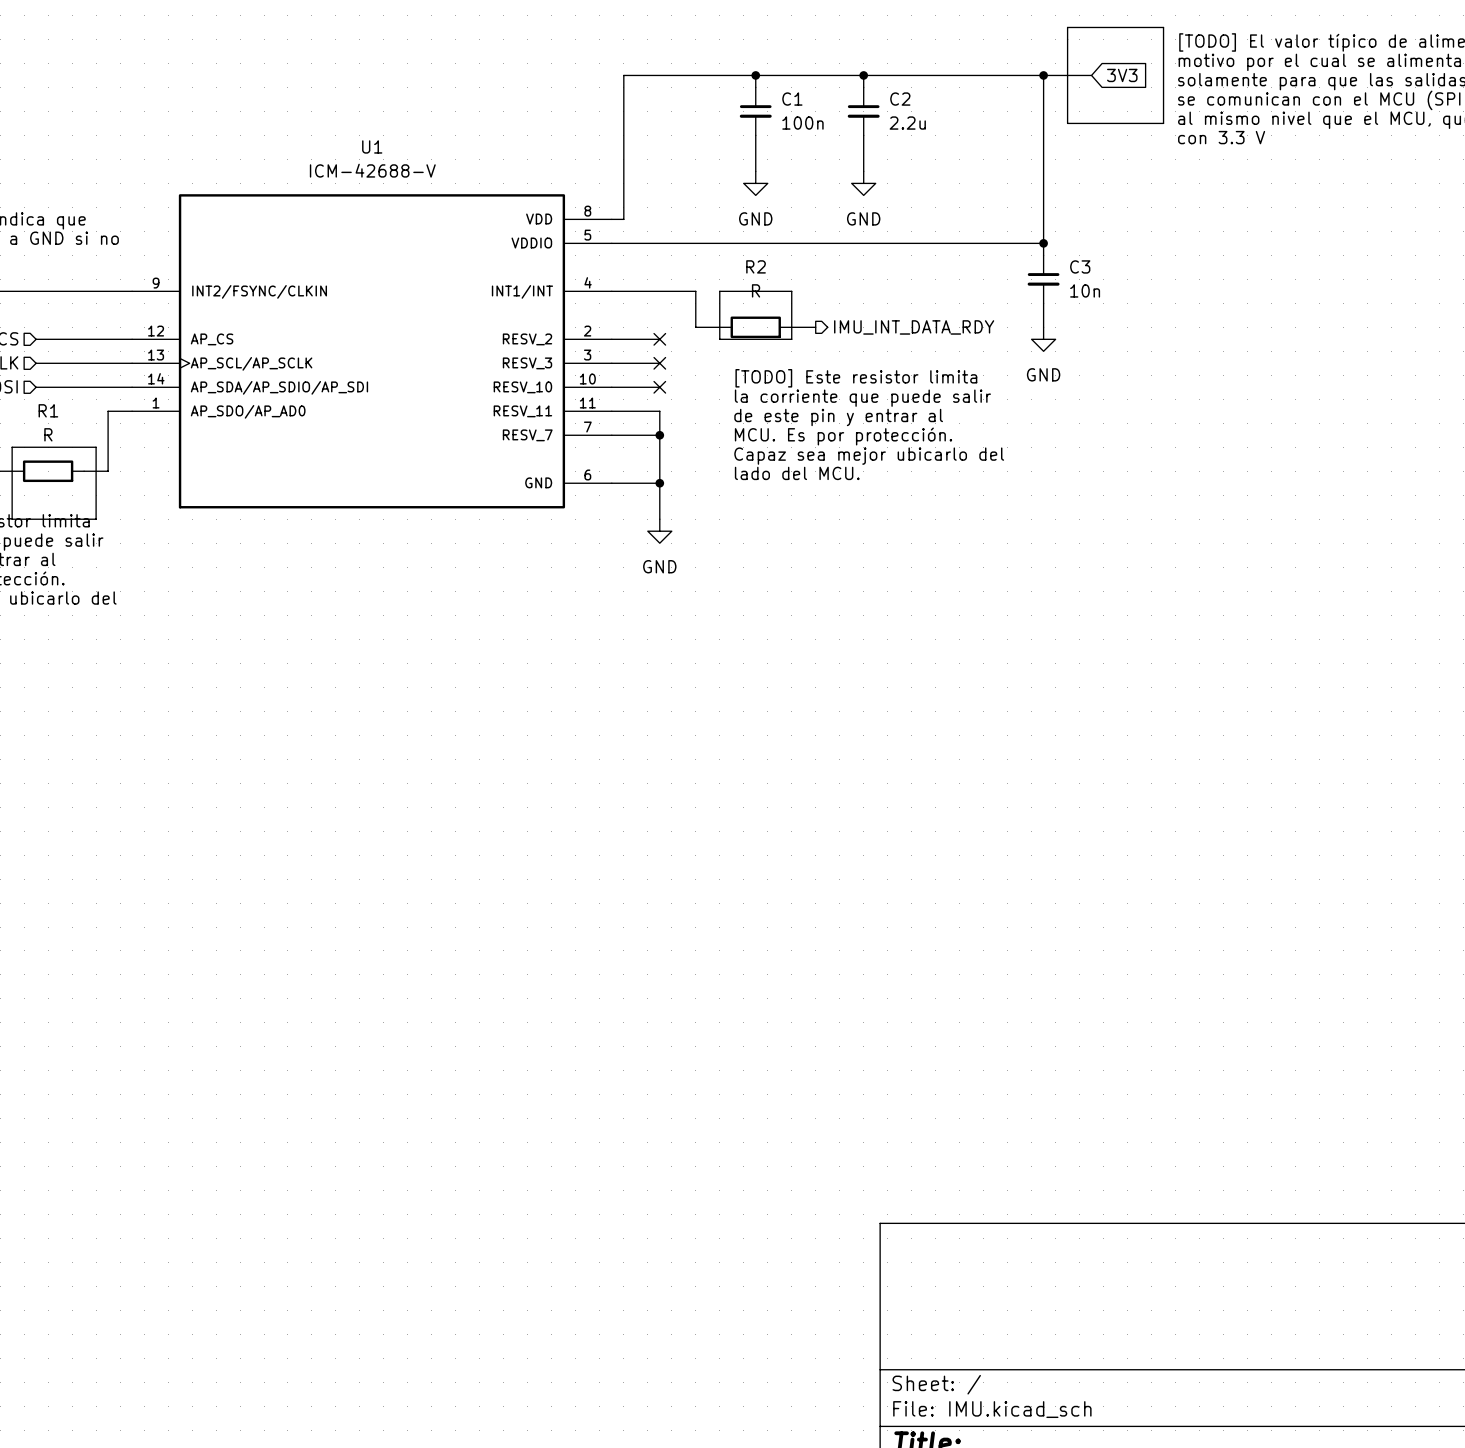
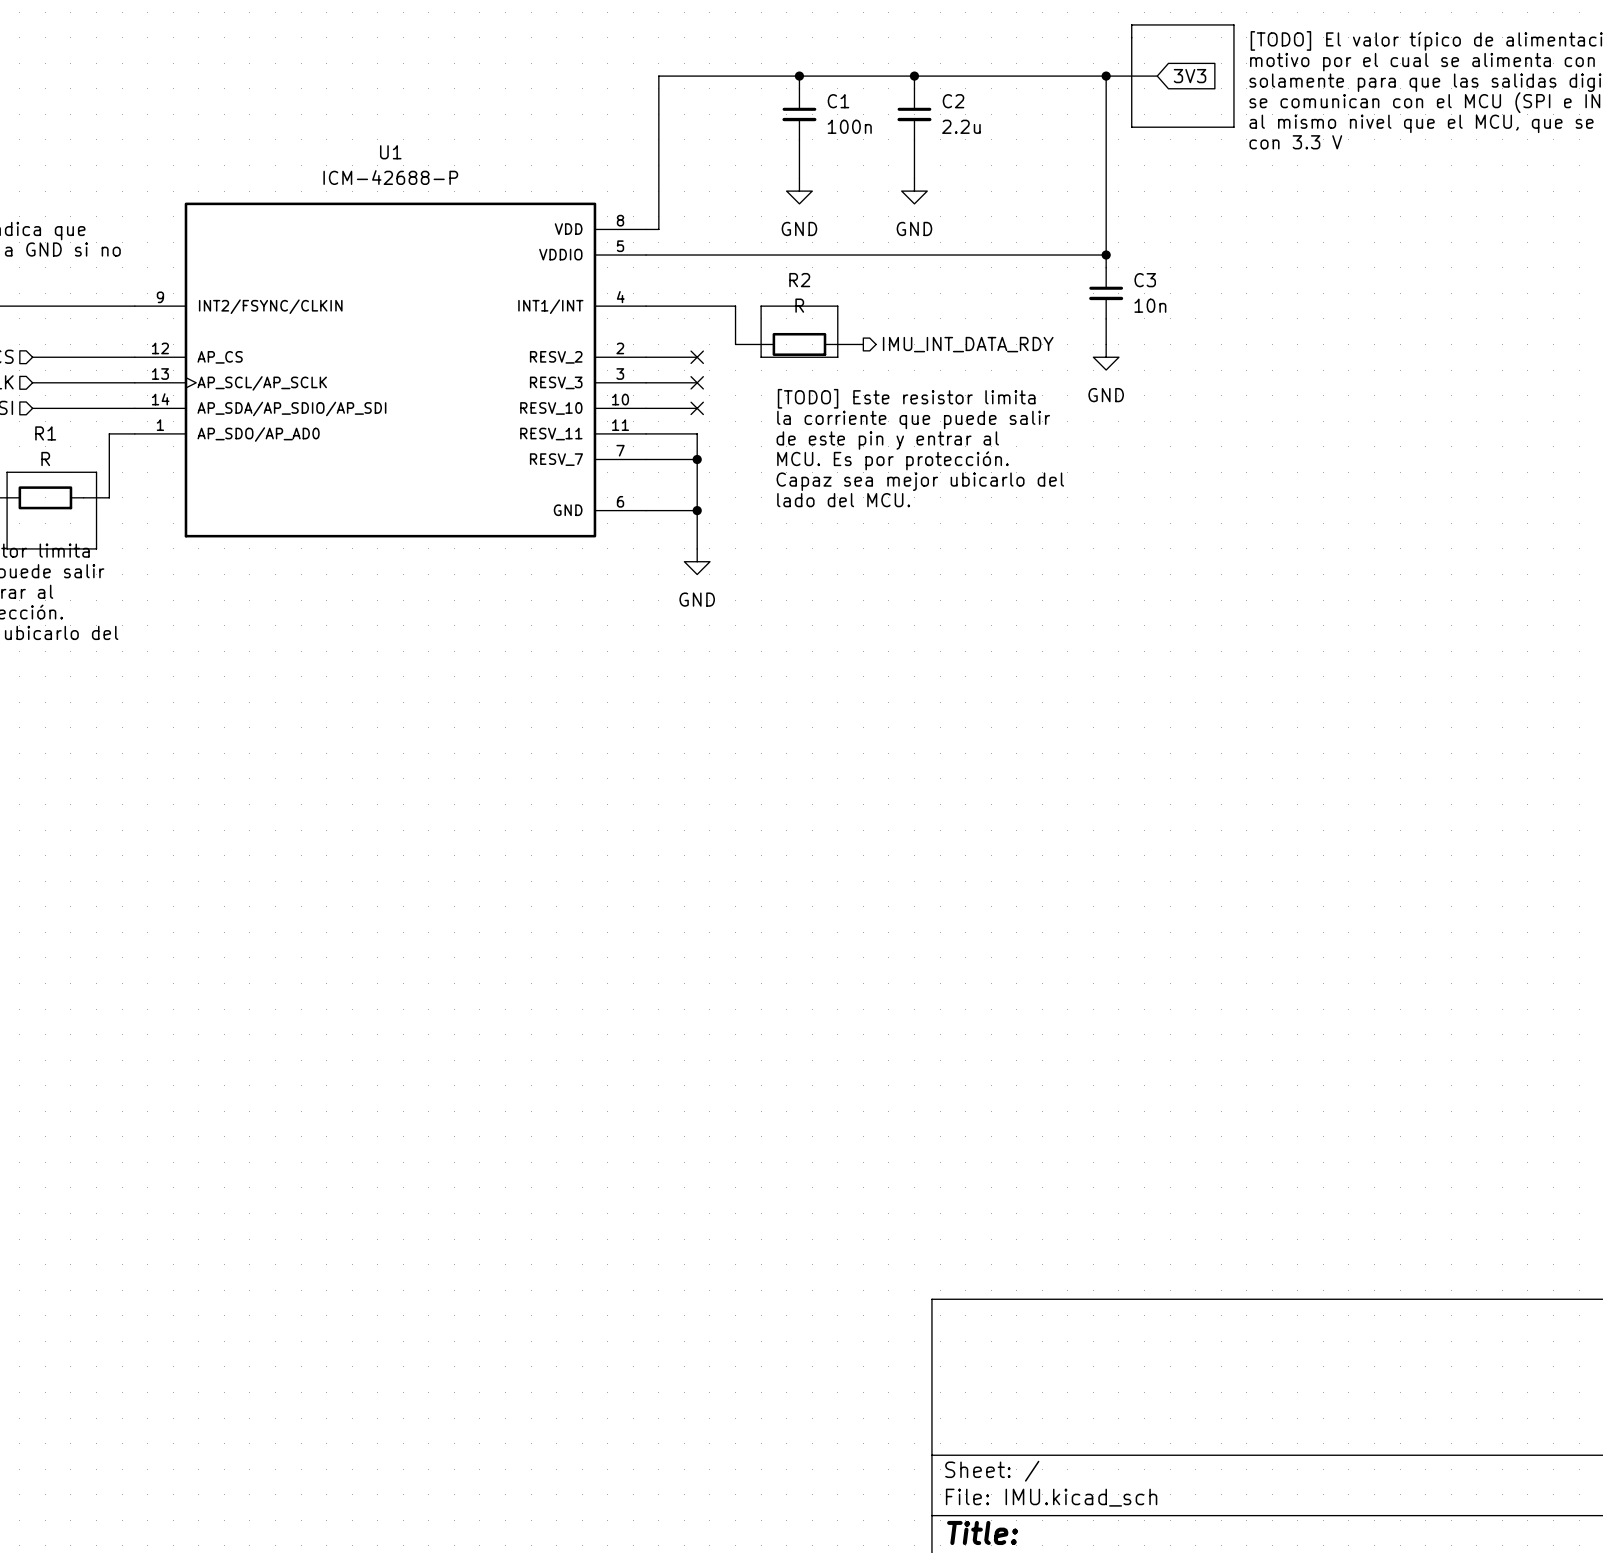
U1 value: ICM-42688-V (372, 170) -> ICM-42688-P (390, 177)

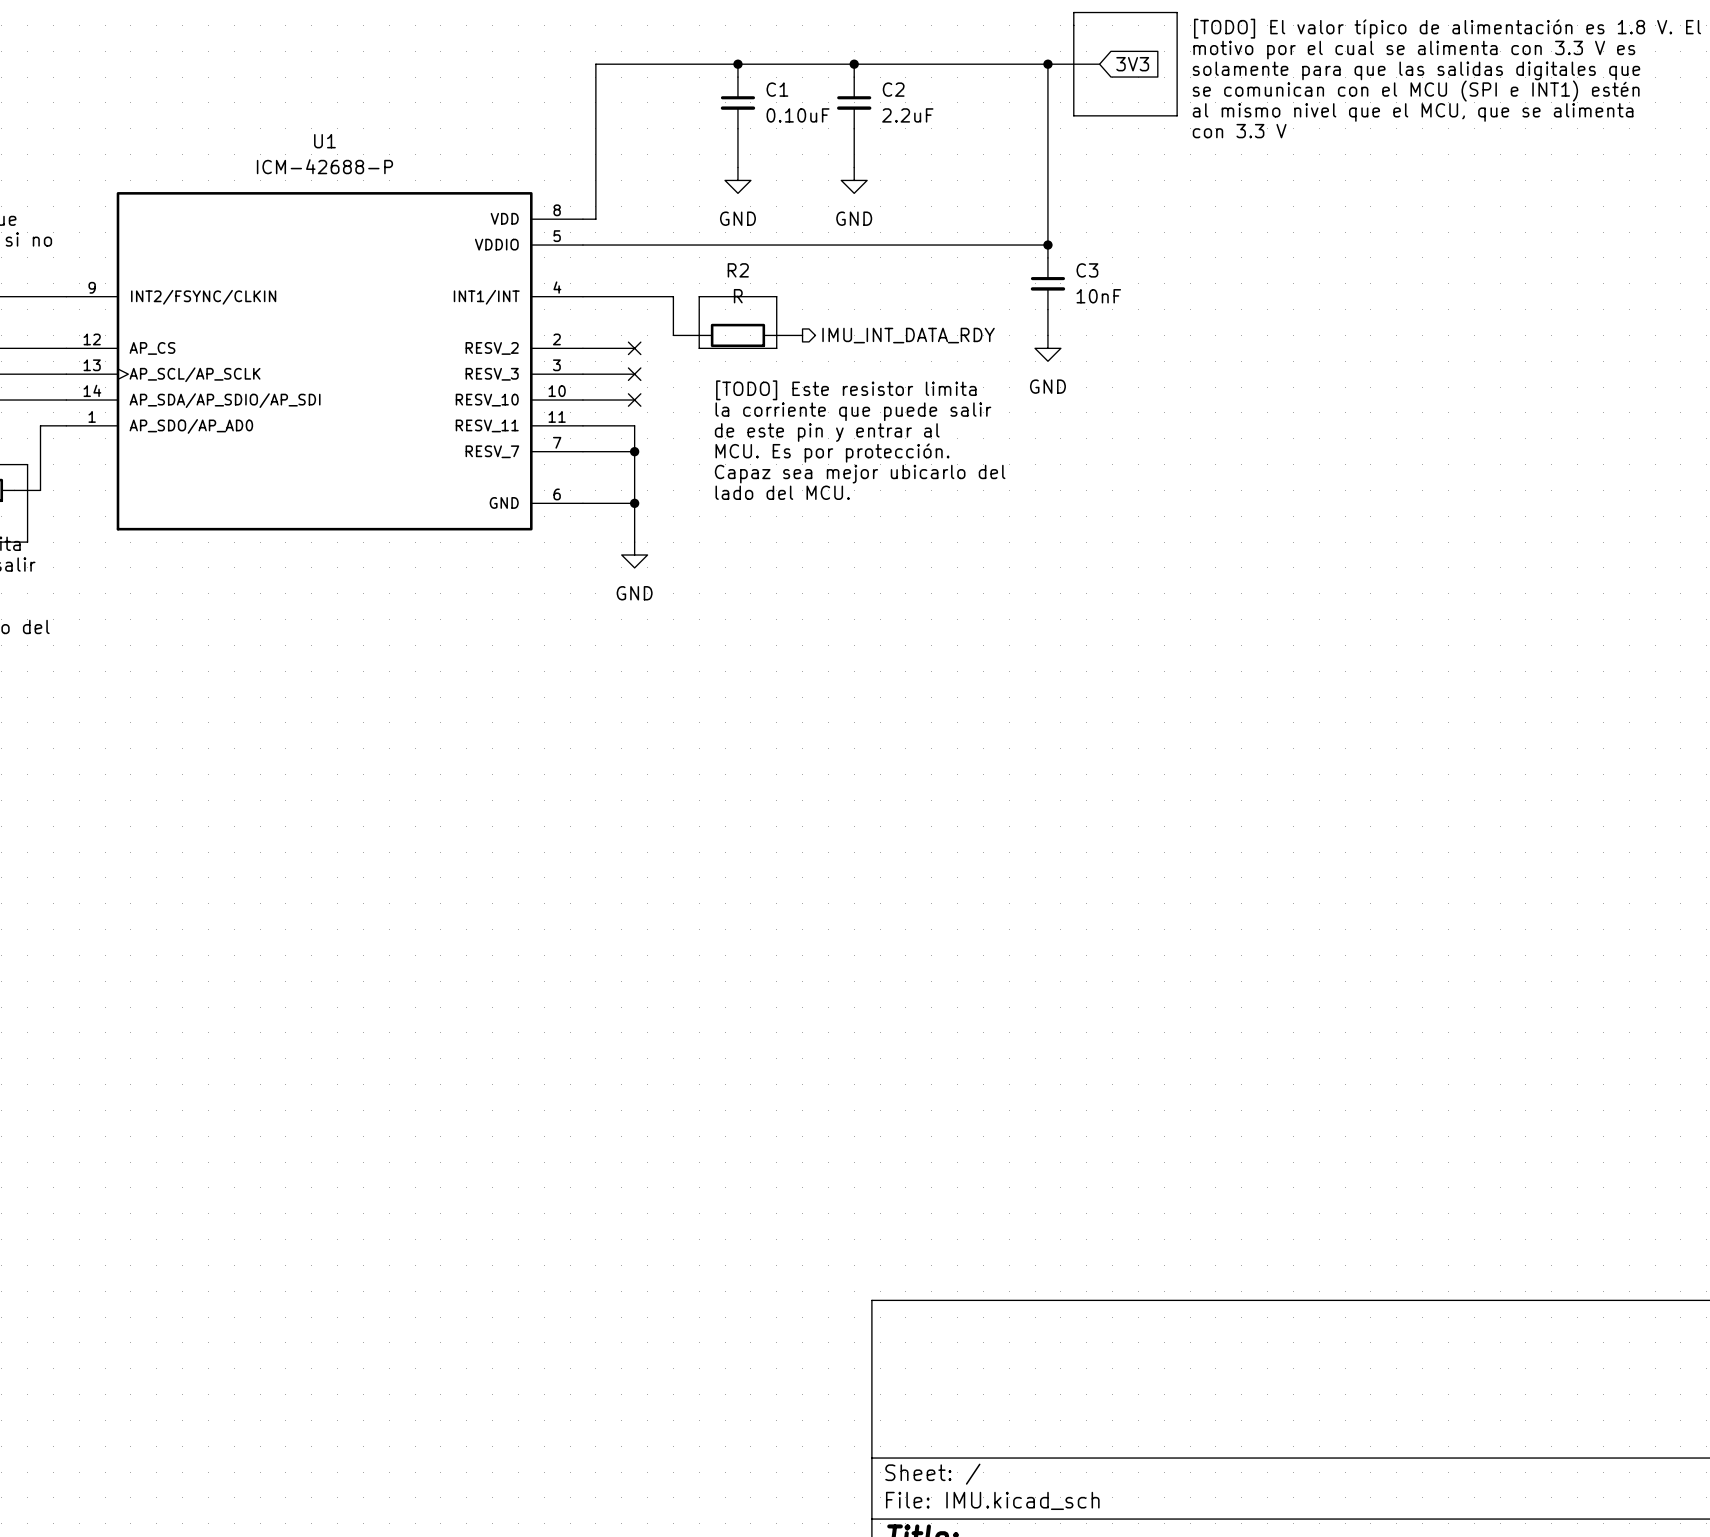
C1 value: 100n (849, 126) -> 0.10uF (798, 115)
C2 value: 2.2u (961, 126) -> 2.2uF (907, 115)
C3 value: 10n (1150, 305) -> 10nF (1098, 296)

